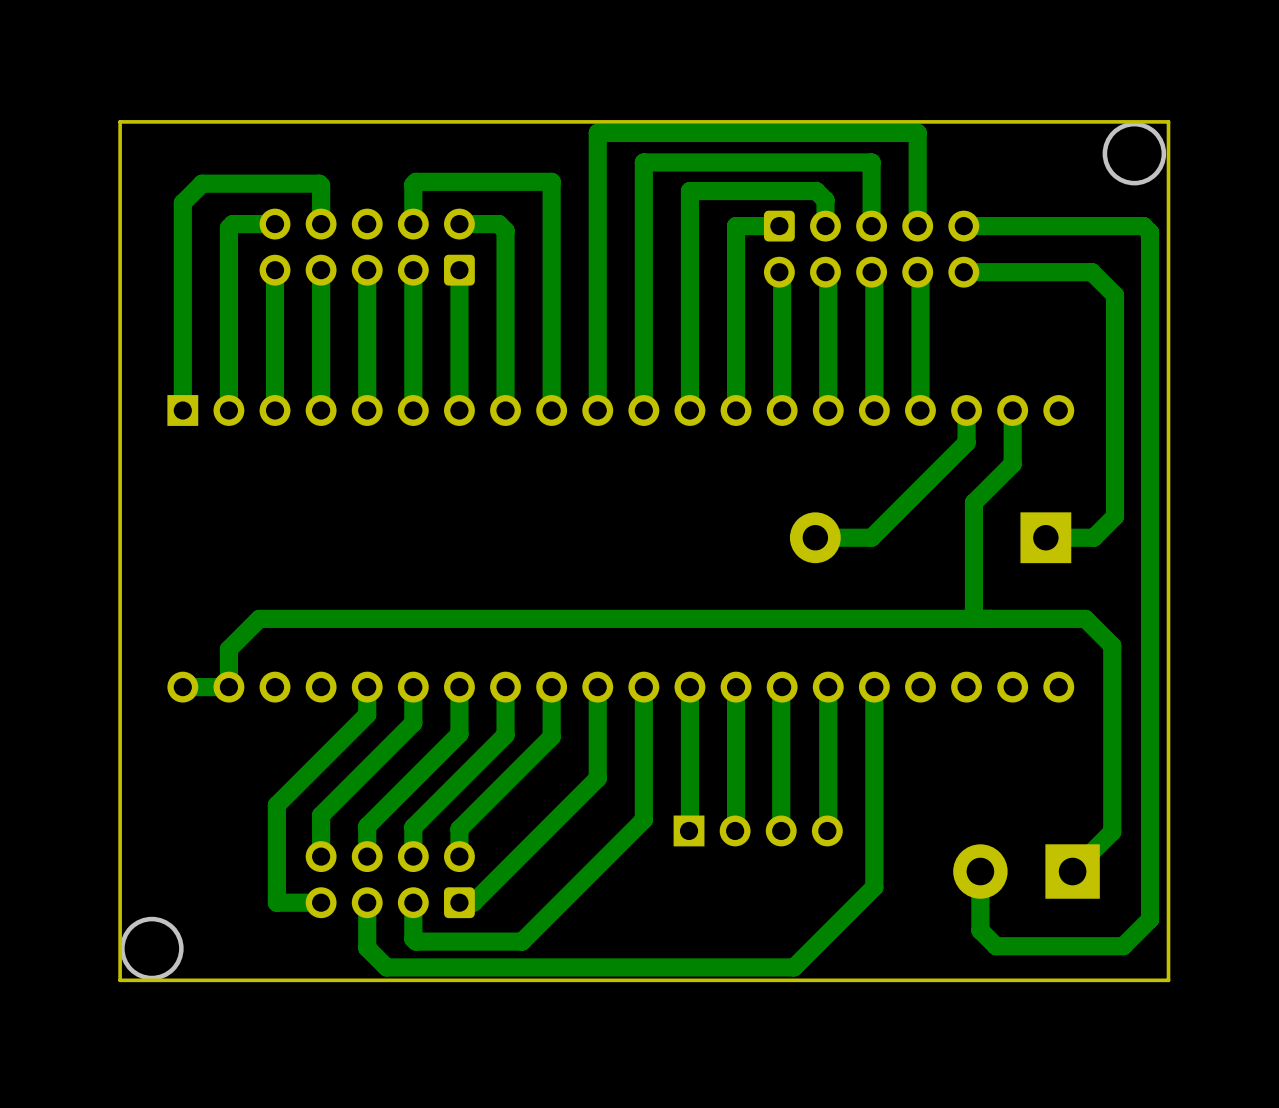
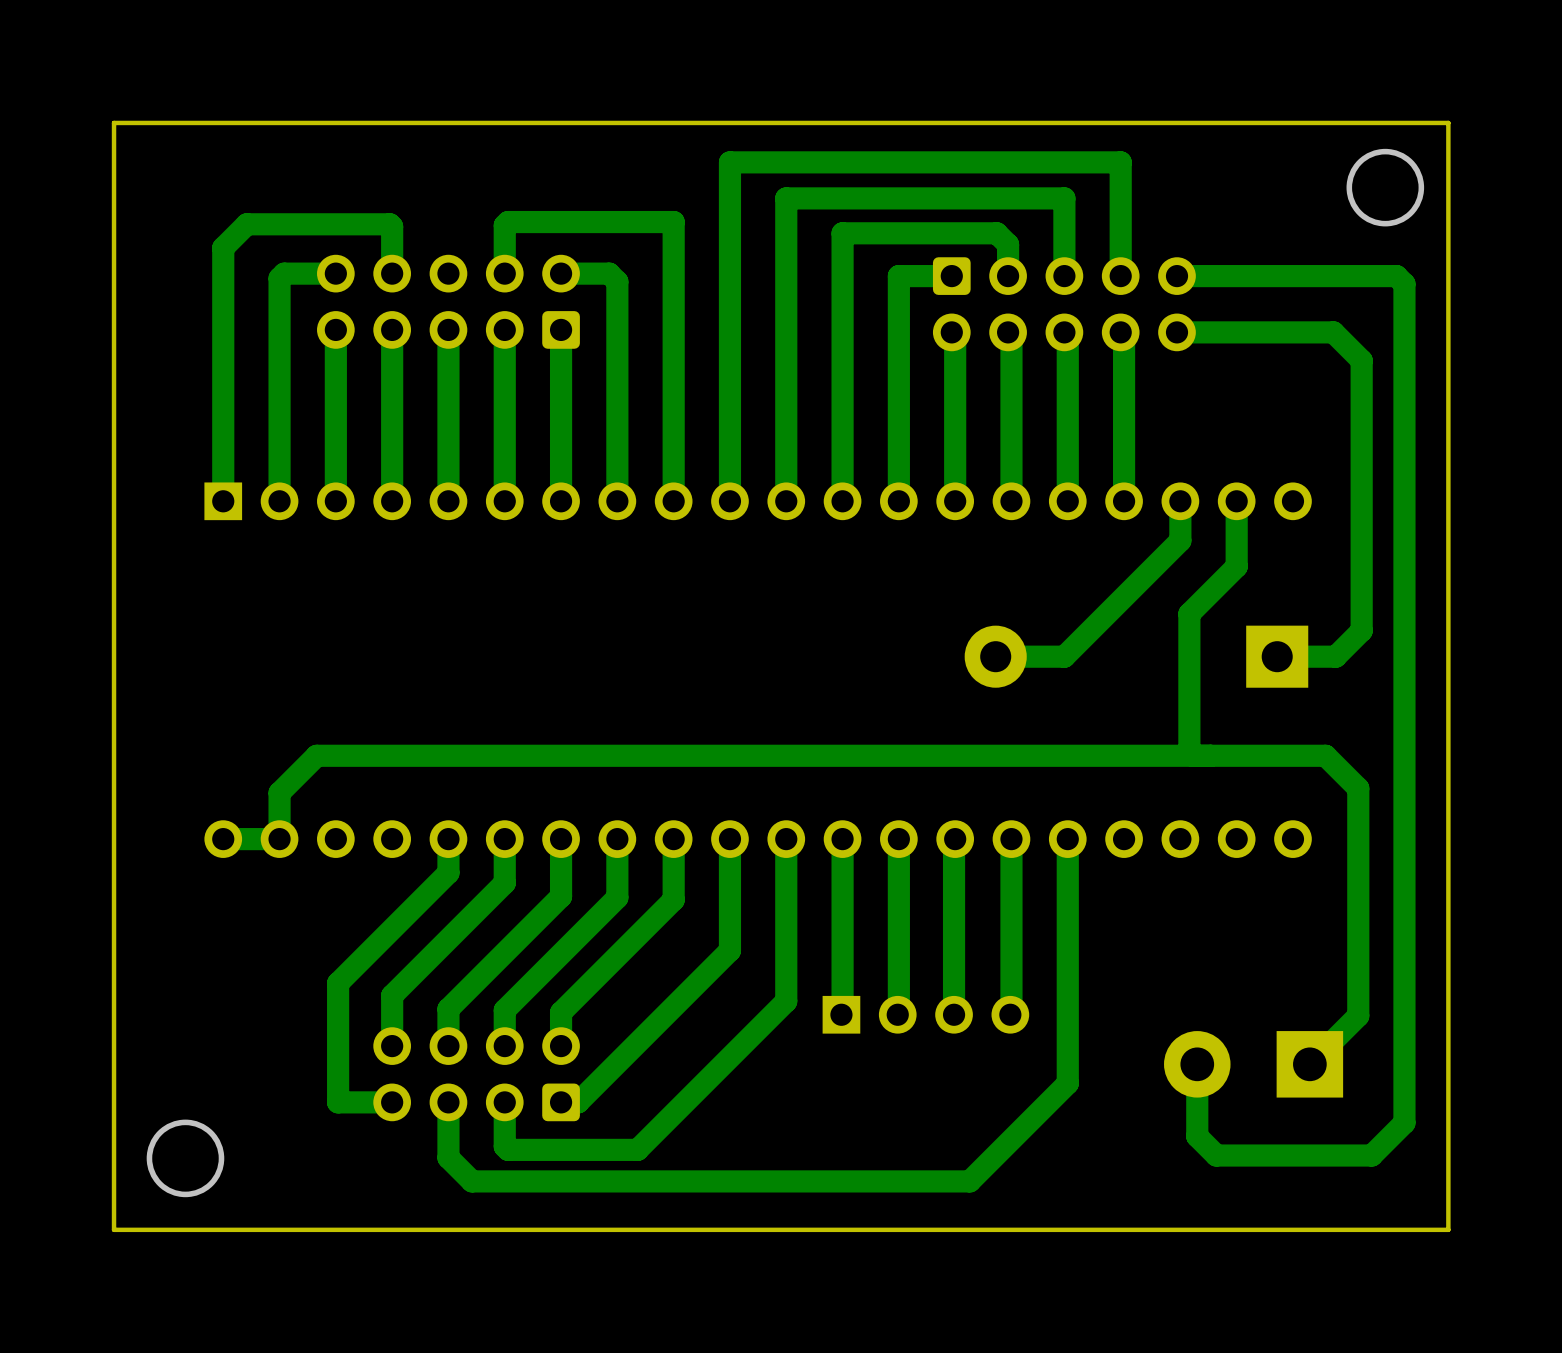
board edge: (1168, 121) (1168, 980) (120, 980) (120, 121) (1168, 121) -> (1448, 122) (1448, 1229) (114, 1229) (114, 122) (1448, 122)

